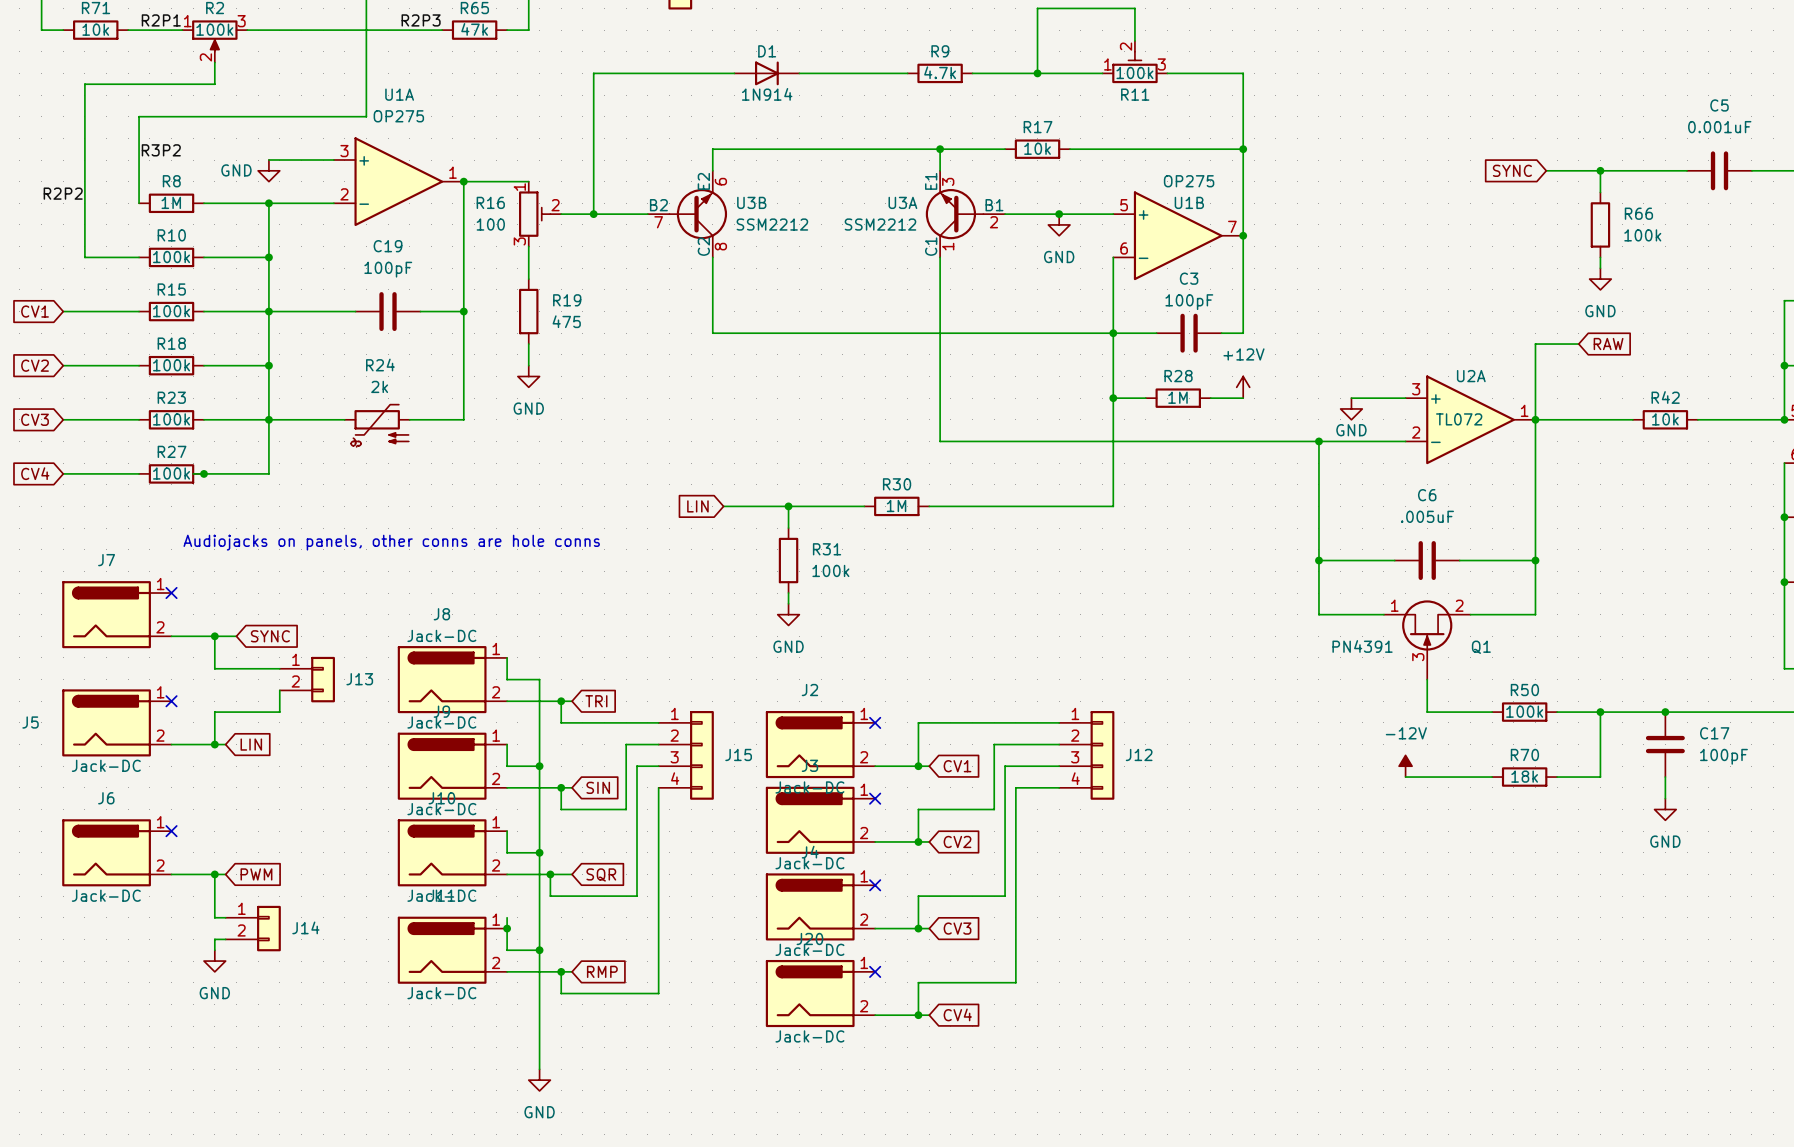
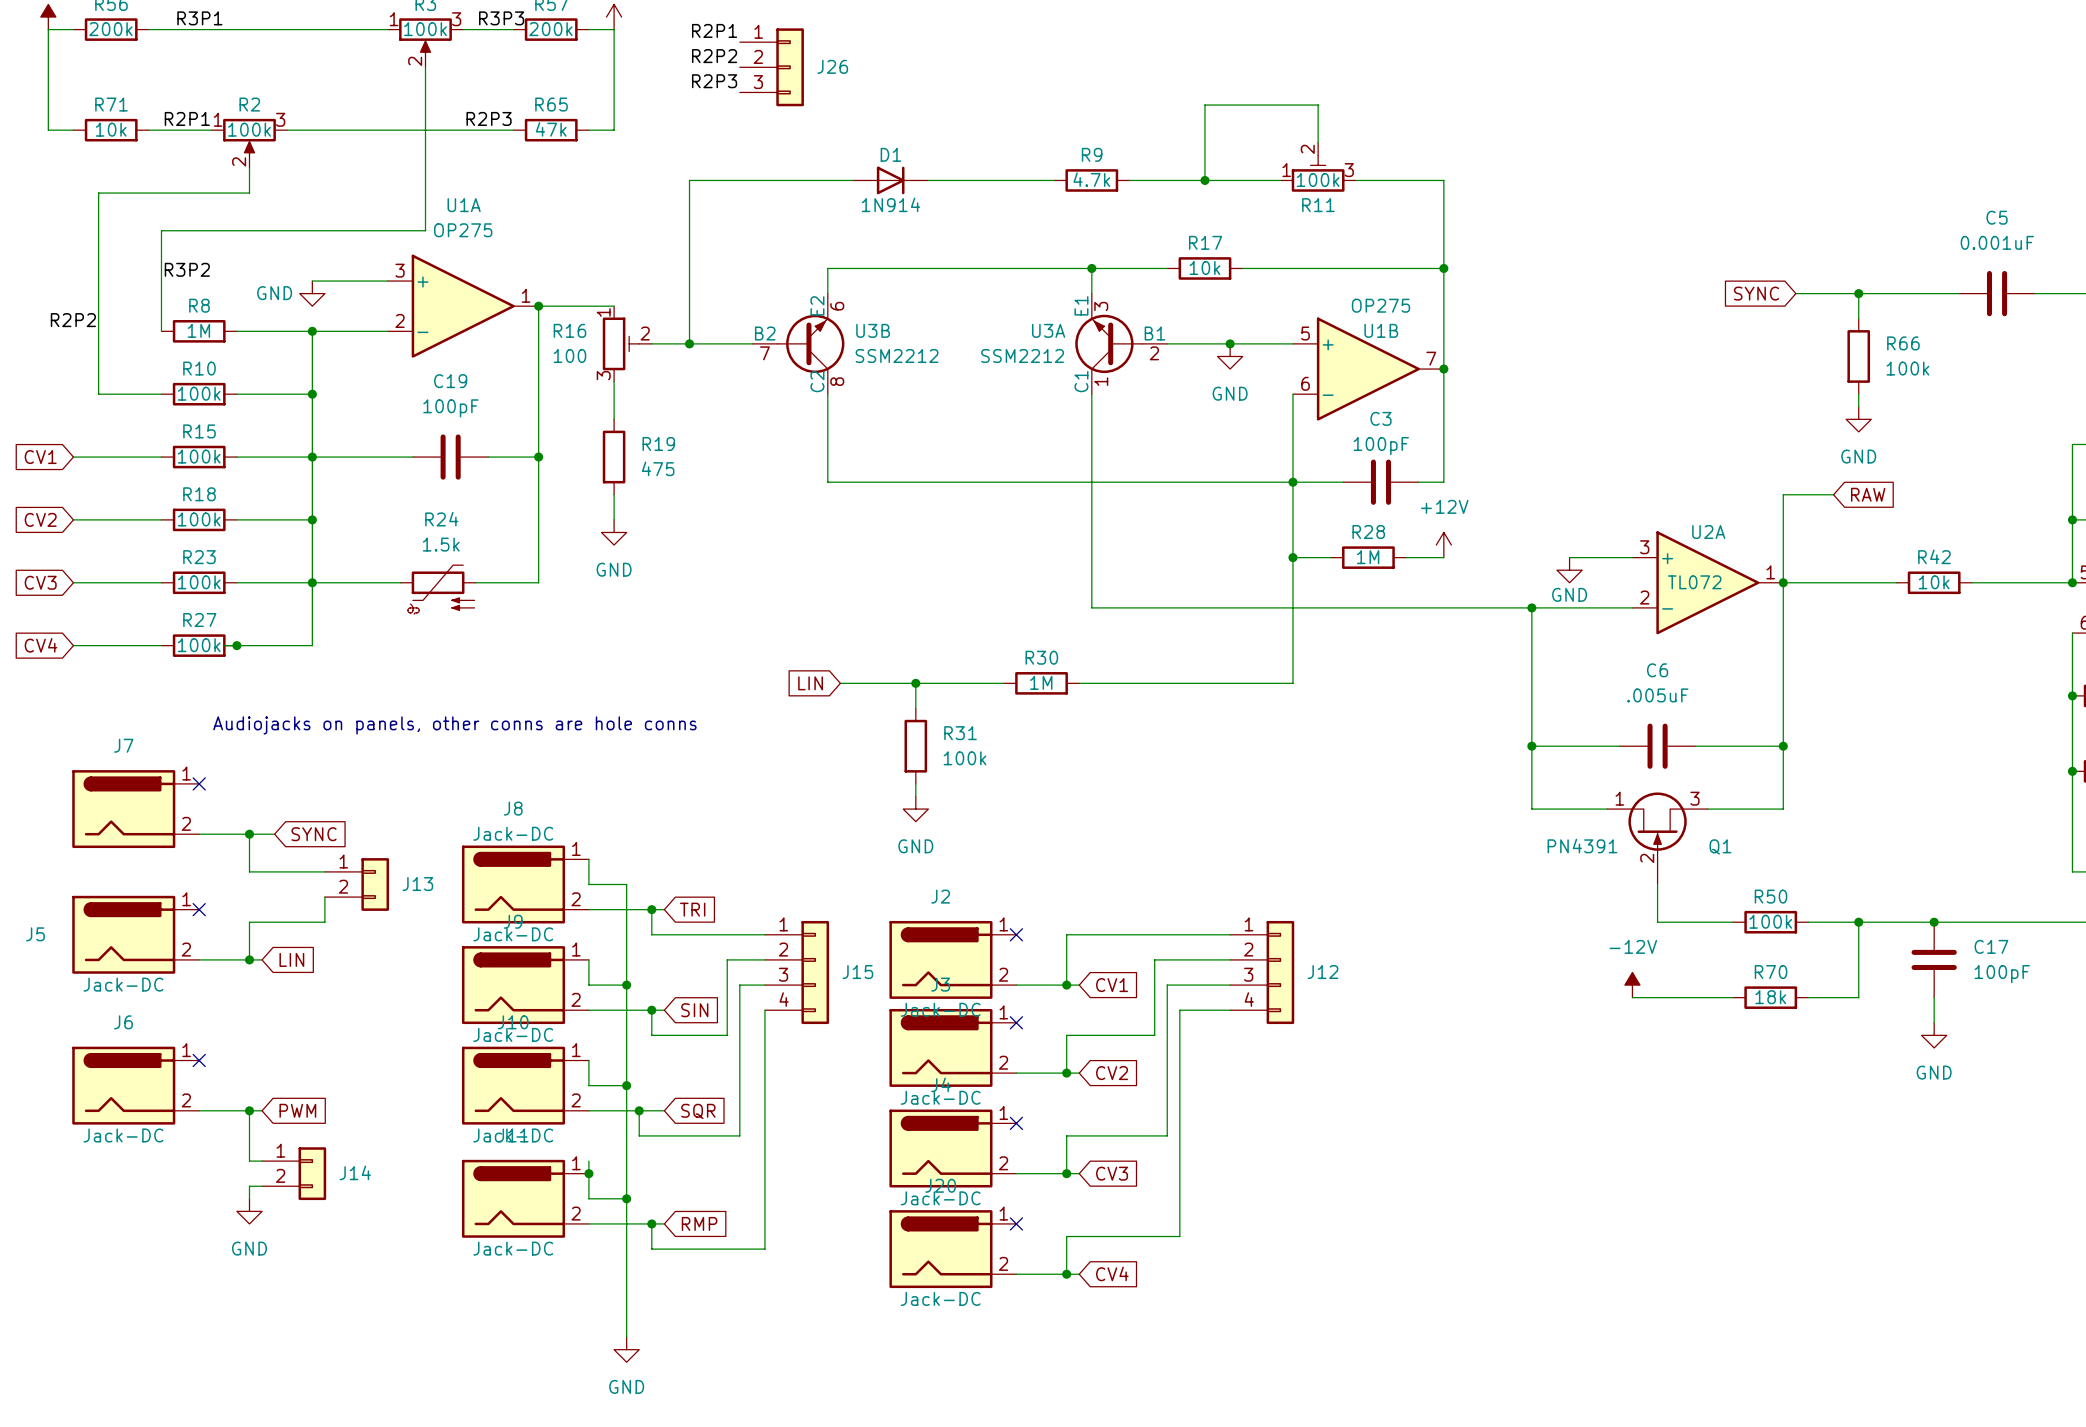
R24 value: 2k (379, 386) -> 1.5k (441, 544)
Q1 pin number: 2 (1459, 605) -> 3 (1694, 798)
Q1 pin number: 3 (1418, 657) -> 2 (1647, 858)

